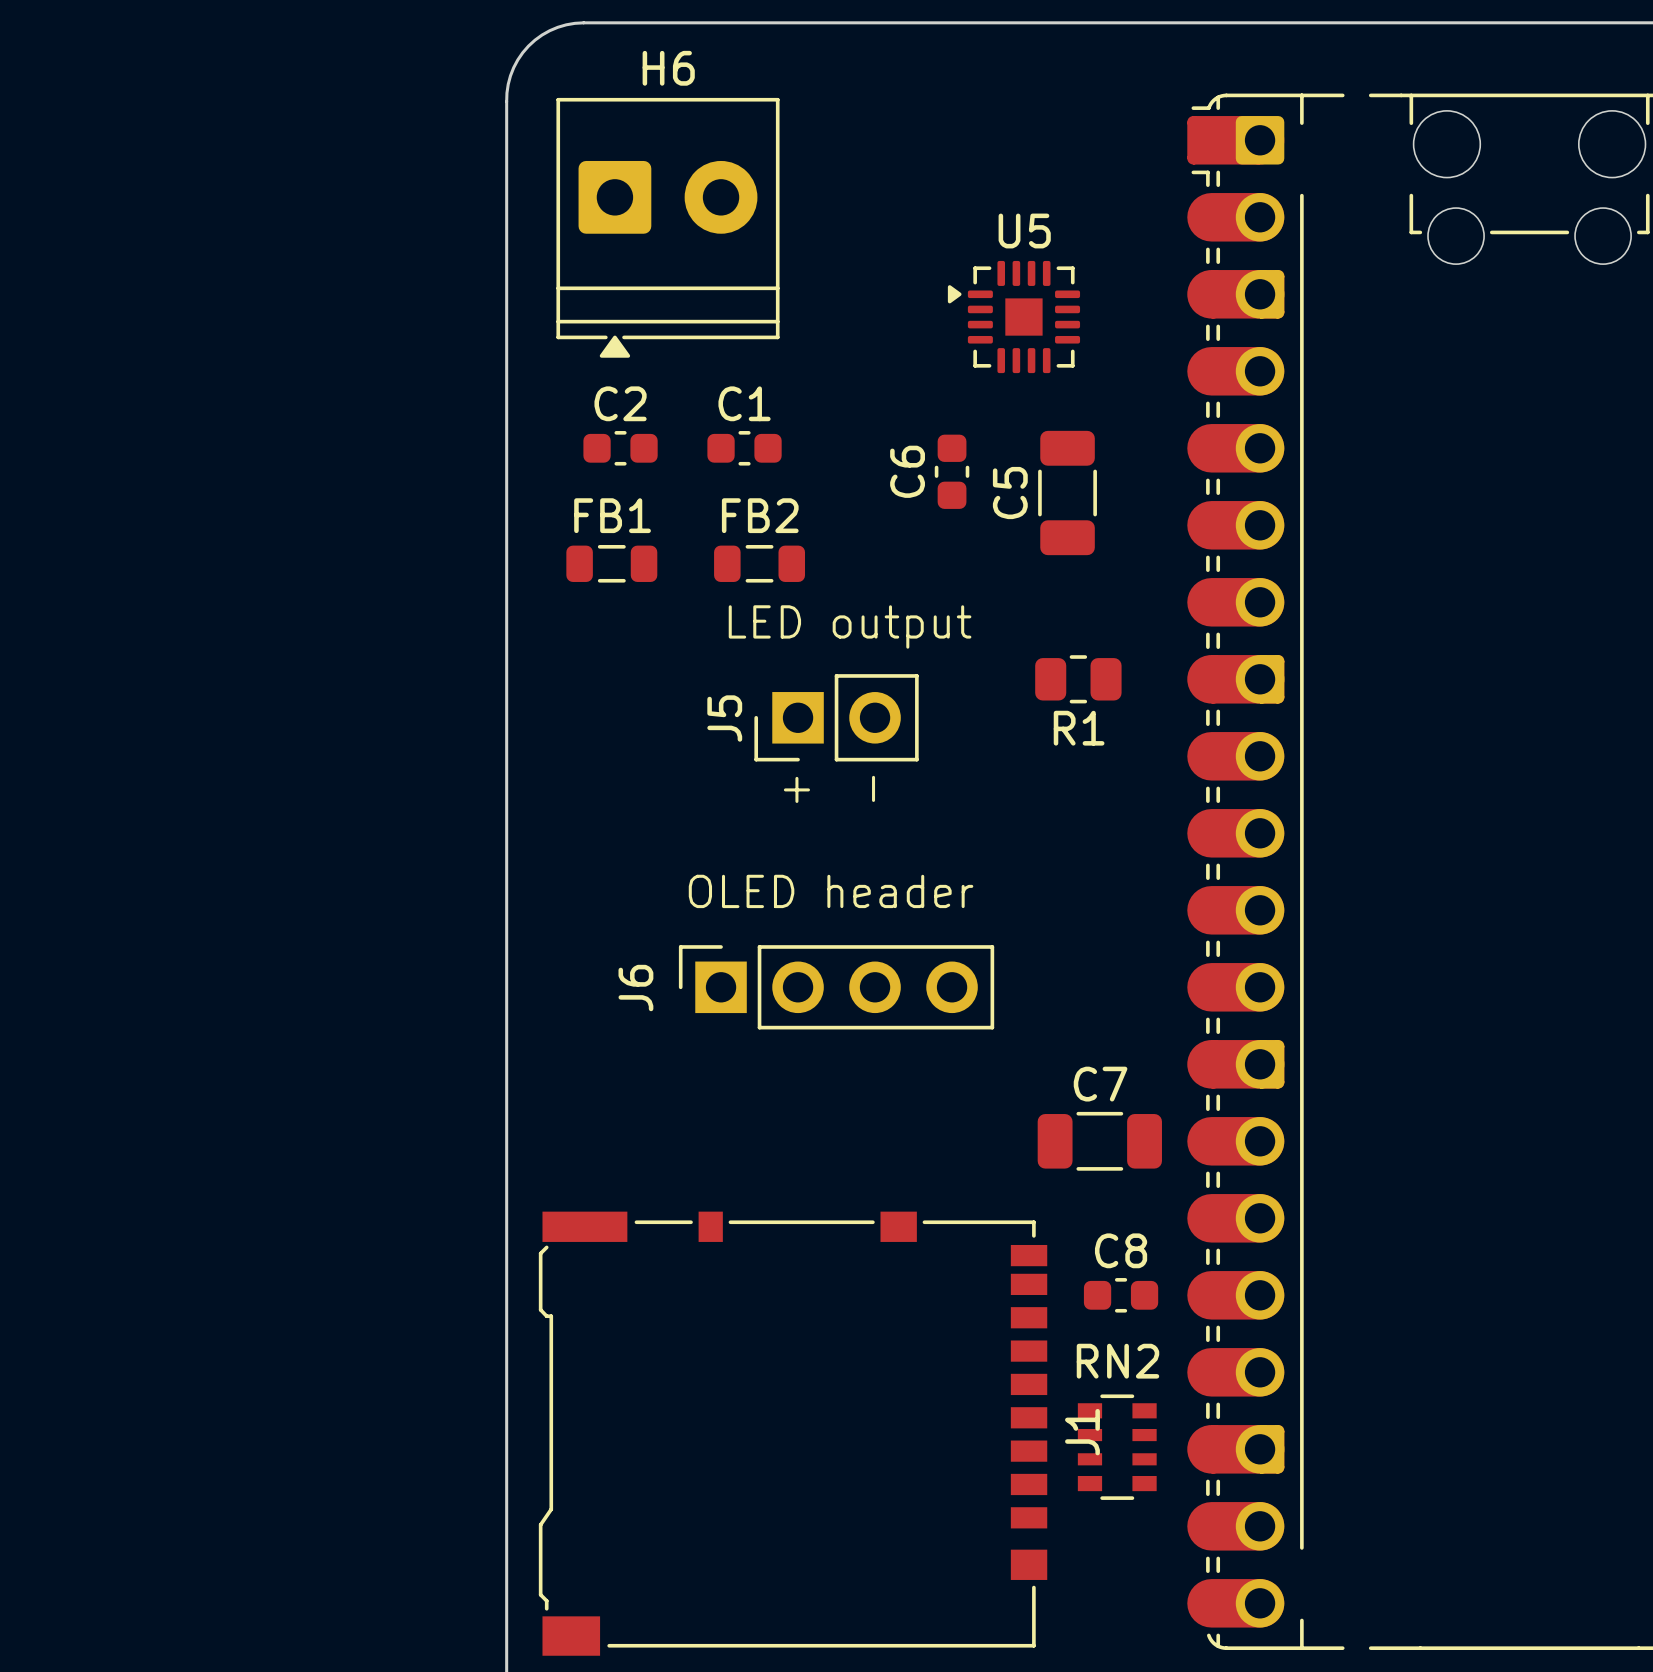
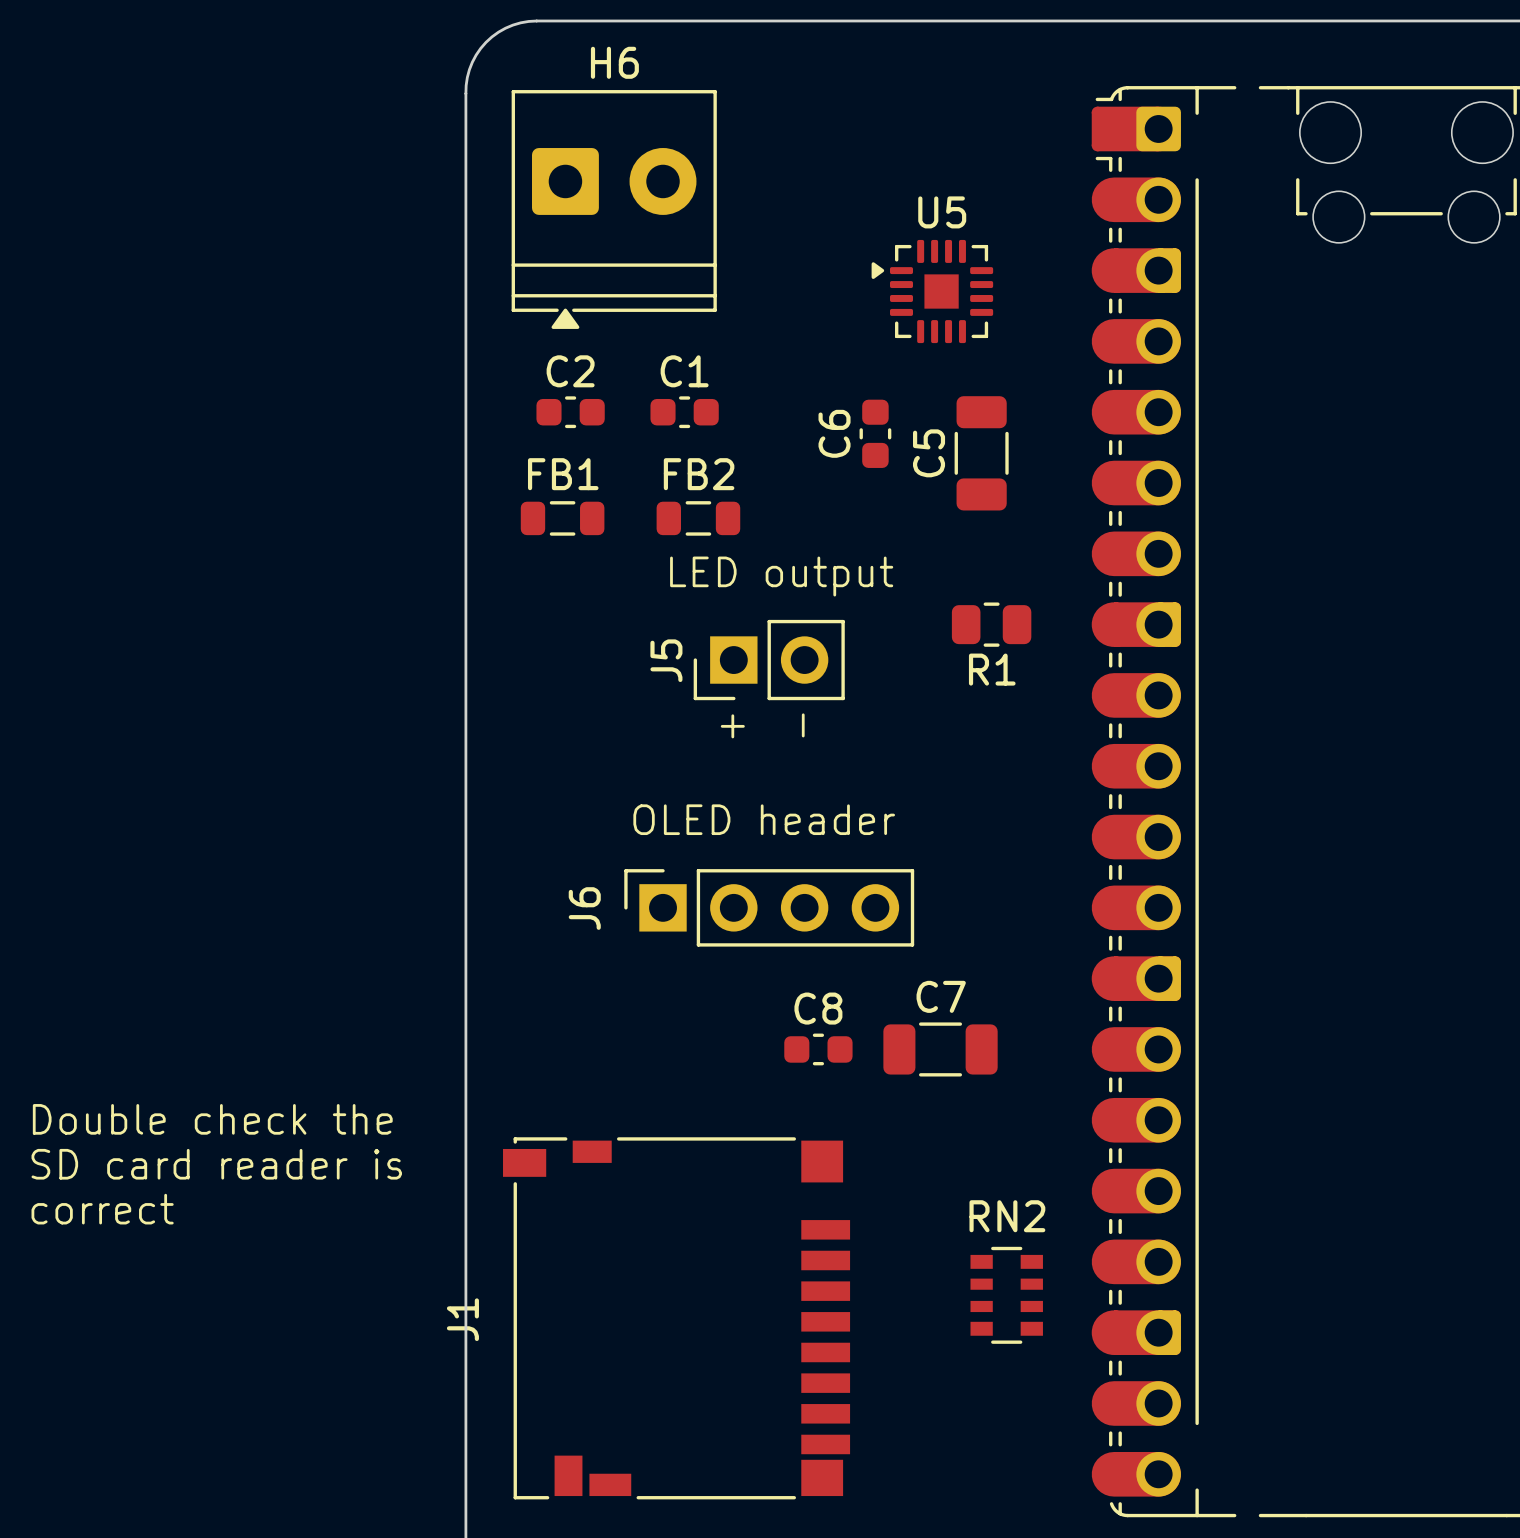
C7 position: (1099, 1141) -> (940, 1049)
J1 footprint: [538, 1211, 1048, 1656] -> [503, 1137, 851, 1500]
text: none -> Double check the (212, 1119)
text: none -> SD card reader is (216, 1164)
C8 position: (1121, 1295) -> (818, 1049)
text: none -> correct (102, 1209)
J1 name position: J1 (1082, 1432) -> J1 (462, 1319)
RN2 position: (1117, 1447) -> (1006, 1295)

